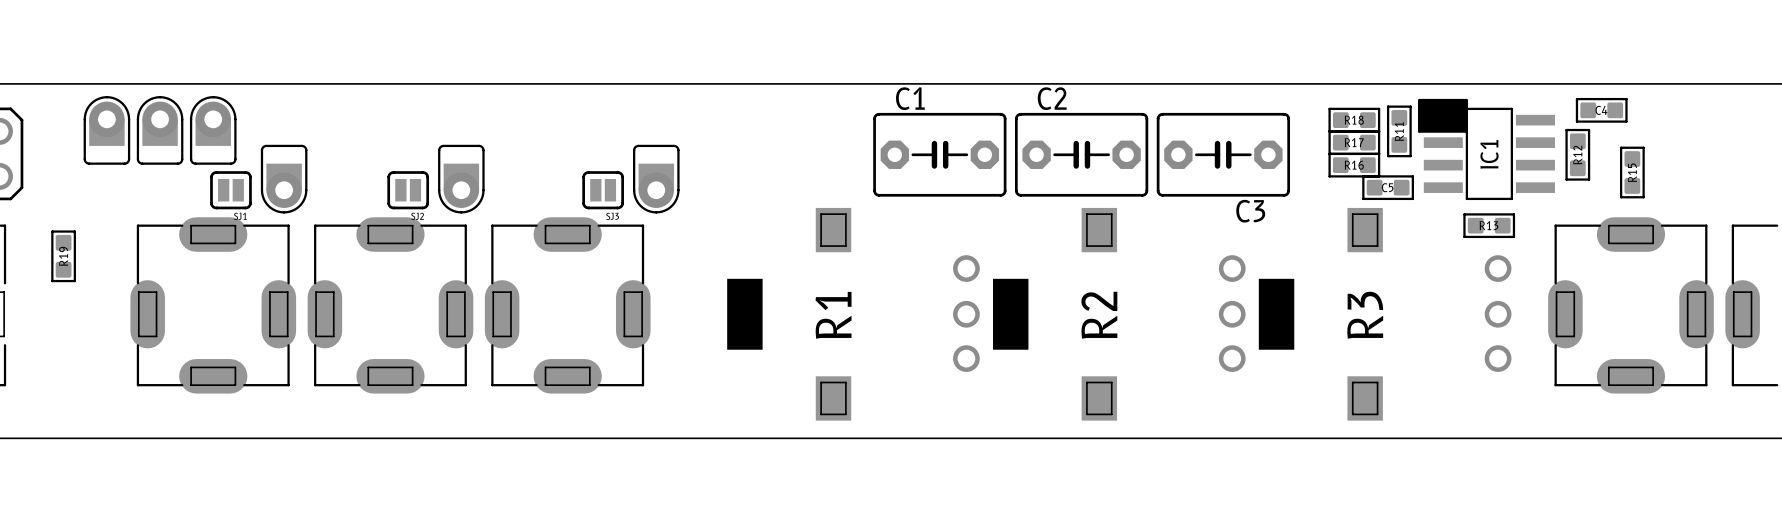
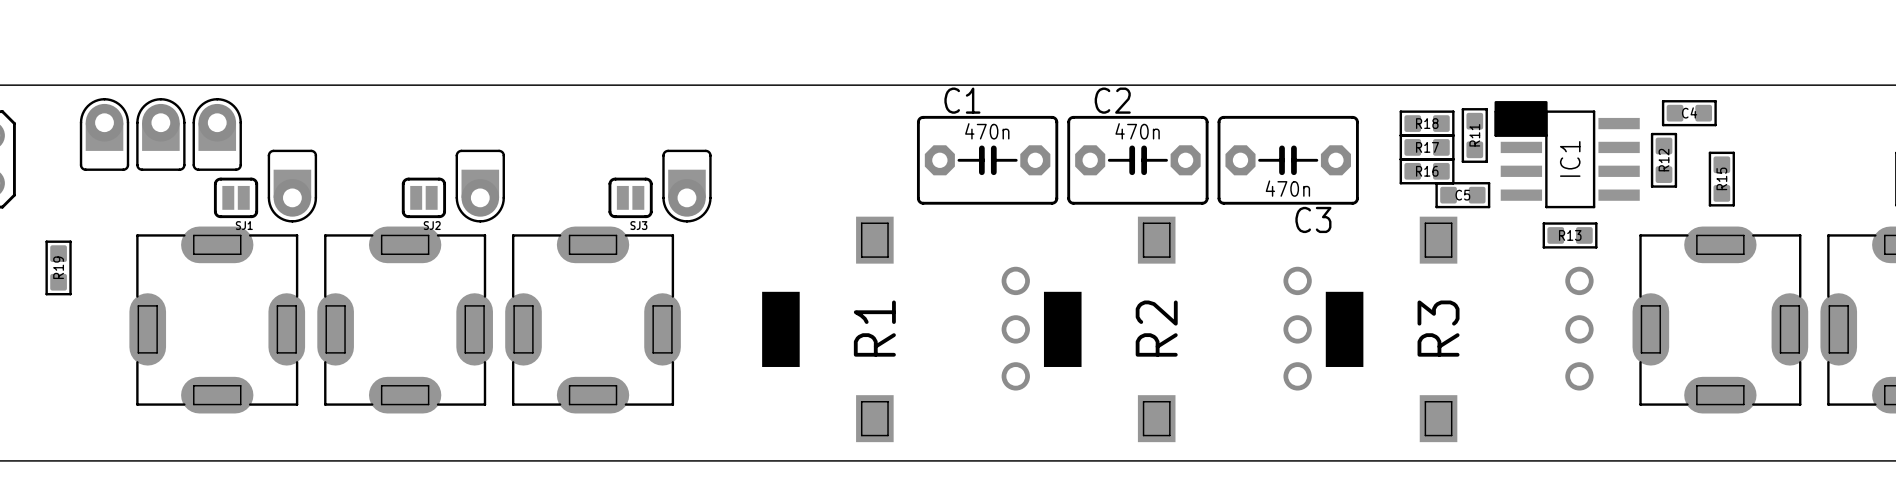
C1 value: none -> 470n (987, 131)
C2 value: none -> 470n (1137, 131)
C3 value: none -> 470n (1287, 188)

